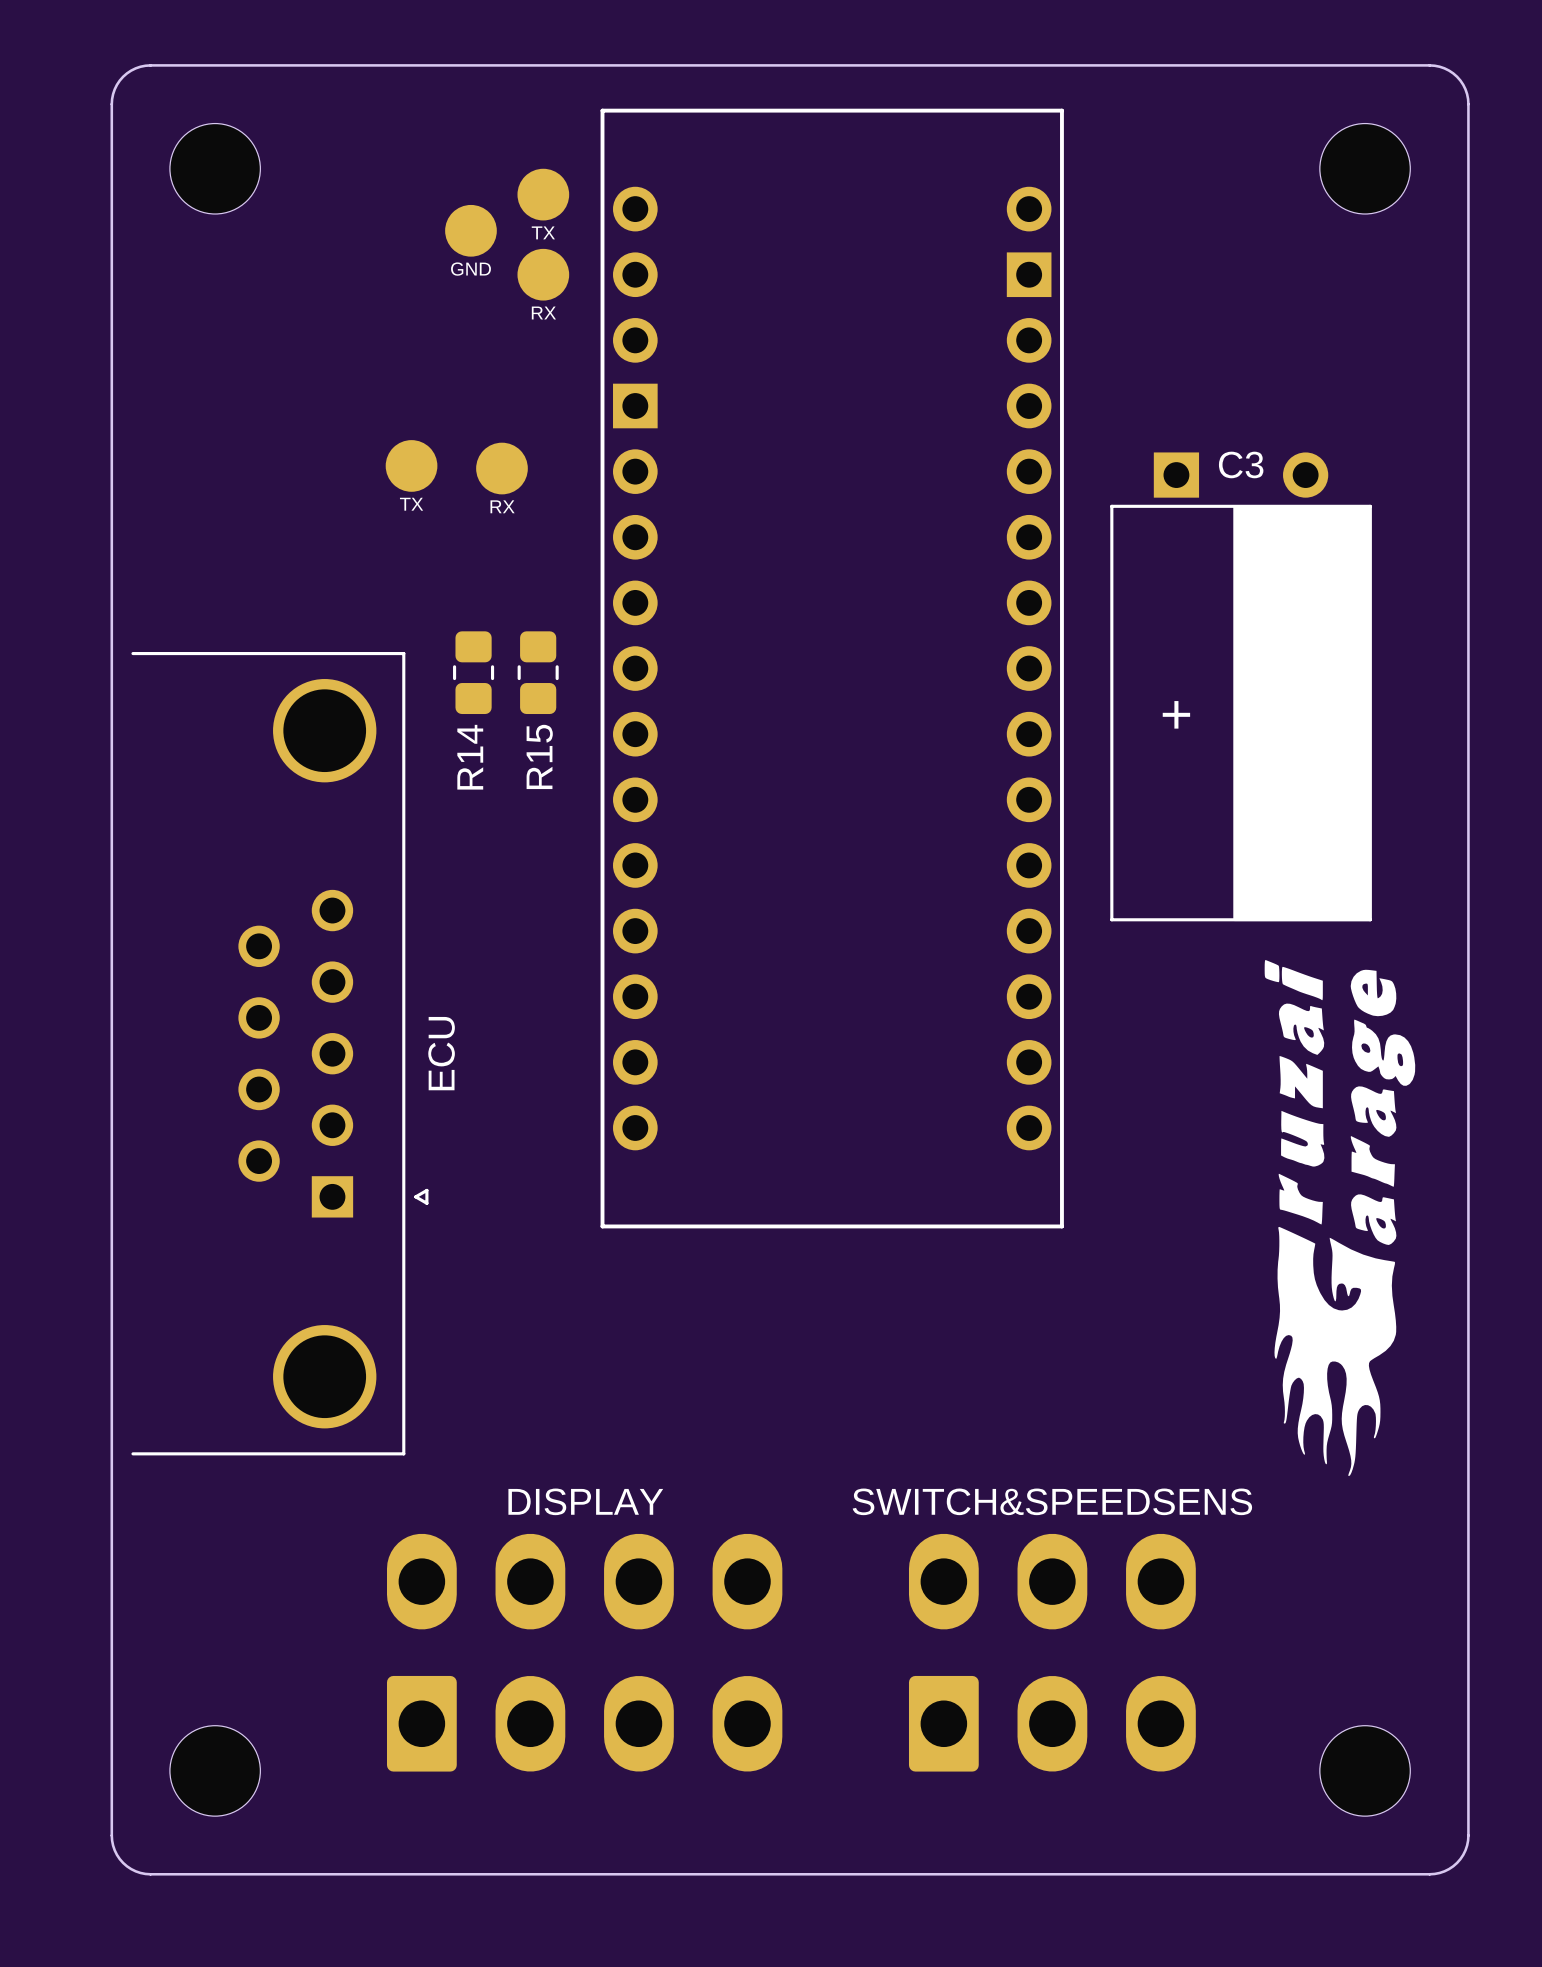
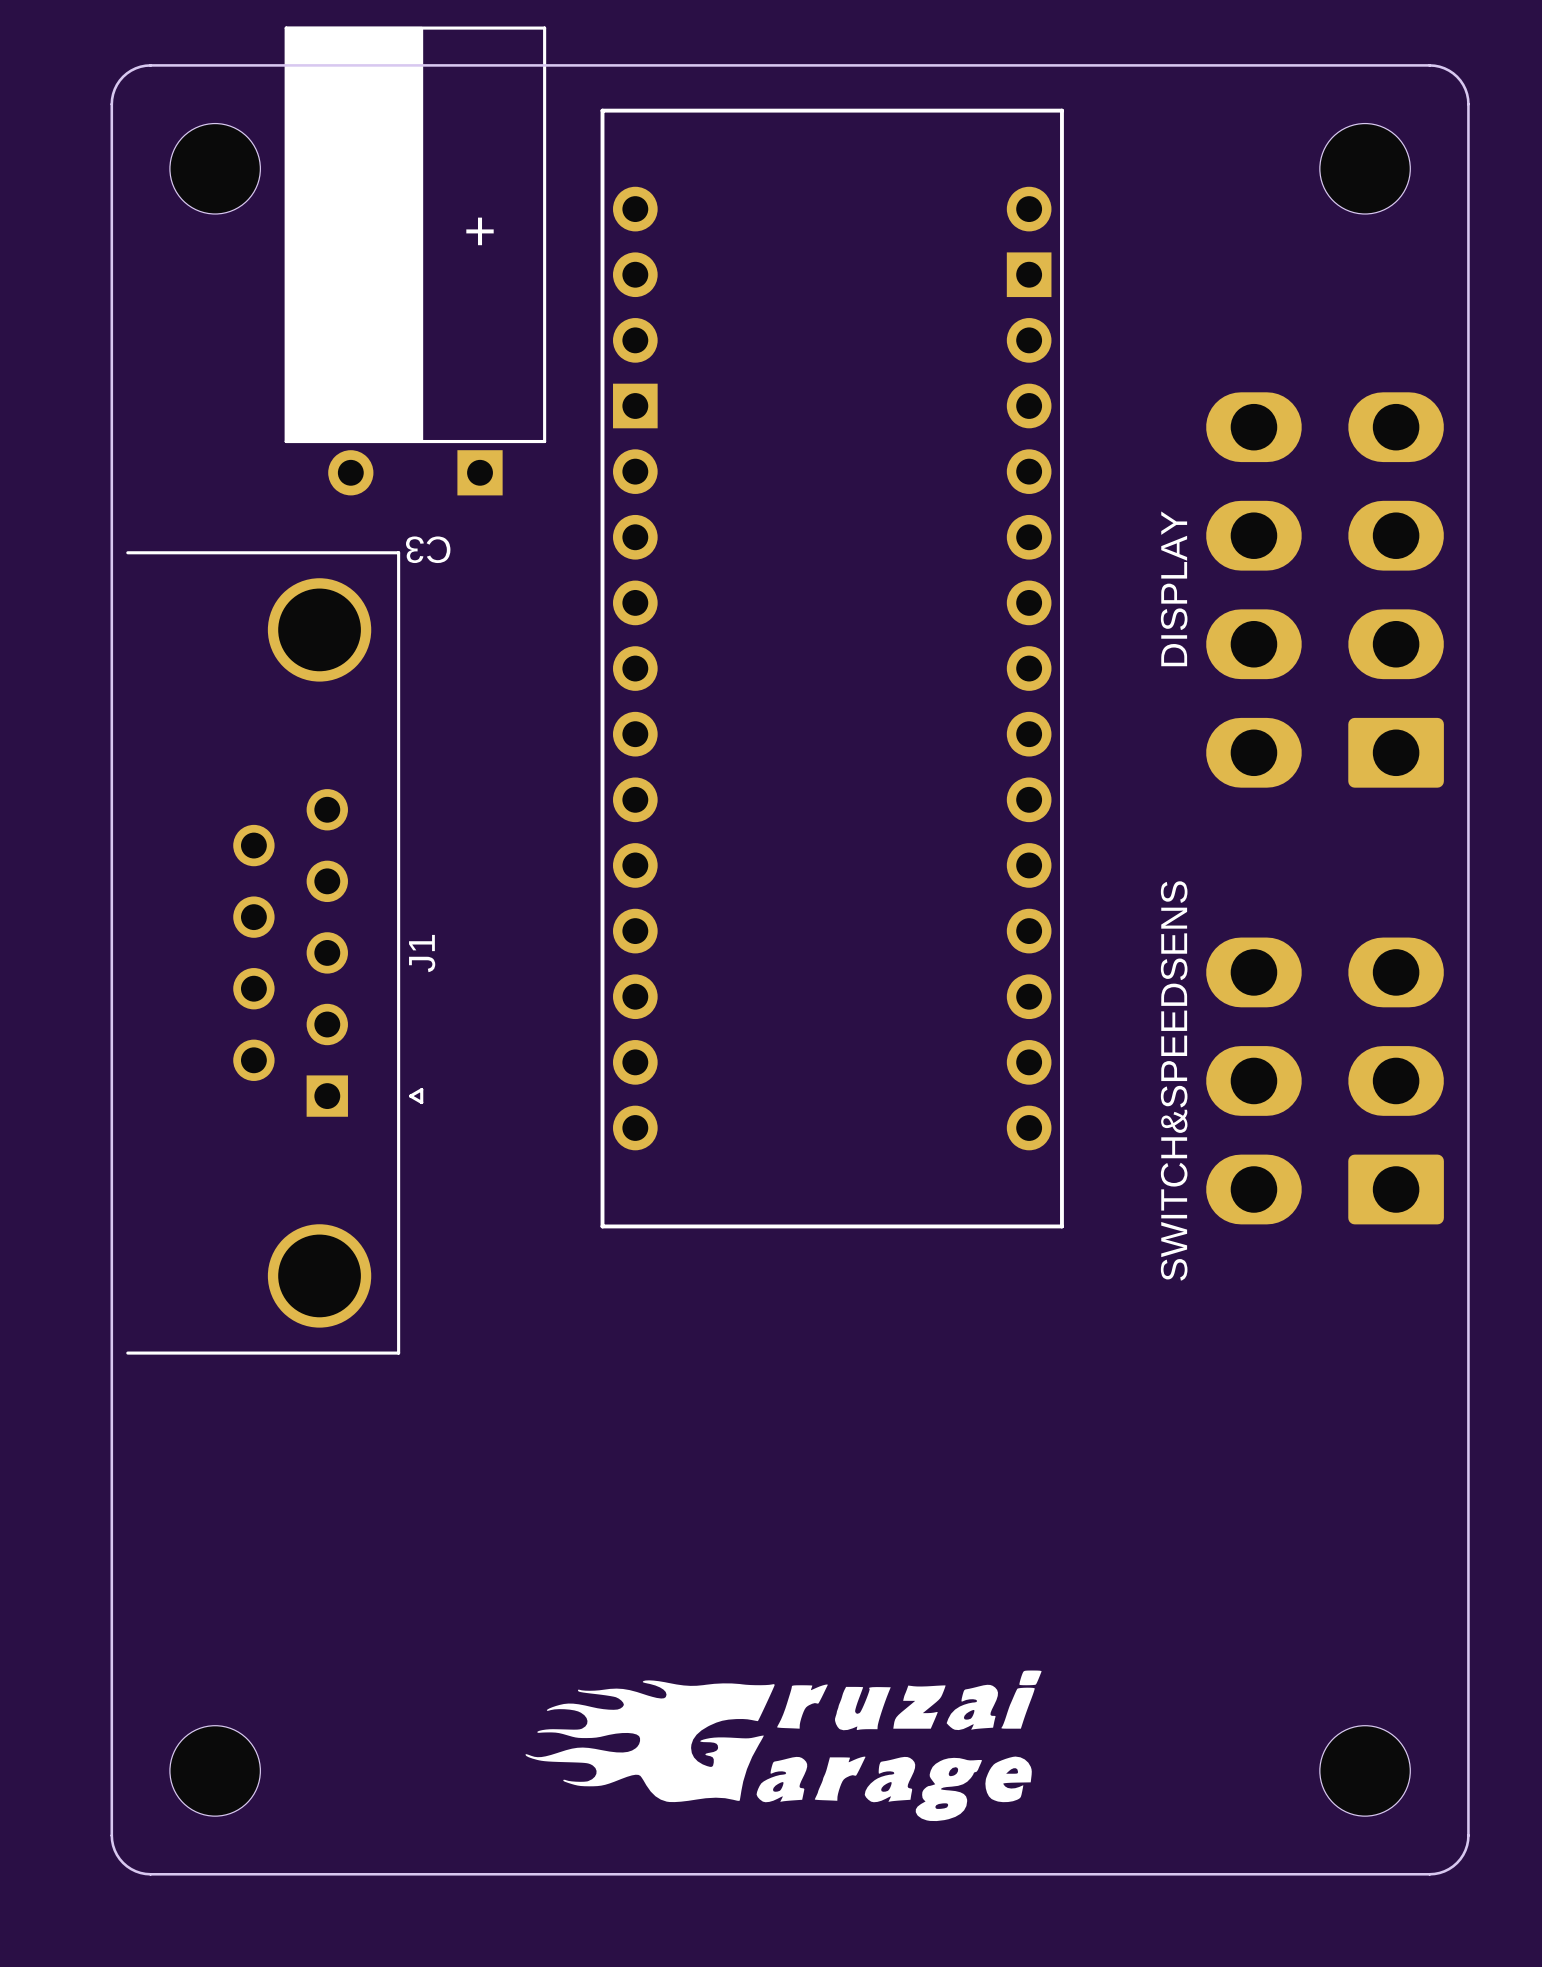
part: TX (543, 194) -> none
part: GND (470, 230) -> none
part: RX (543, 274) -> none
C3 name position: C3 (1241, 464) -> C3 (428, 549)
part: TX (411, 465) -> none
part: RX (501, 468) -> none
part: none -> DISPLAY (1325, 589)
R14: (473, 672) -> none
R15: (538, 672) -> none
C3 rotation: 0° (1241, 686) -> 180° (415, 260)
C3 position: (1241, 686) -> (415, 260)
J1: none -> (274, 952)
drawing: [1264, 960, 1416, 1477] -> none
part: ECU (279, 1053) -> none
part: DISPLAY (584, 1652) -> none
part rotation: 0° (1052, 1652) -> 90° counterclockwise (1325, 1080)
part position: (1052, 1652) -> (1325, 1080)
drawing: none -> [525, 1670, 1042, 1822]

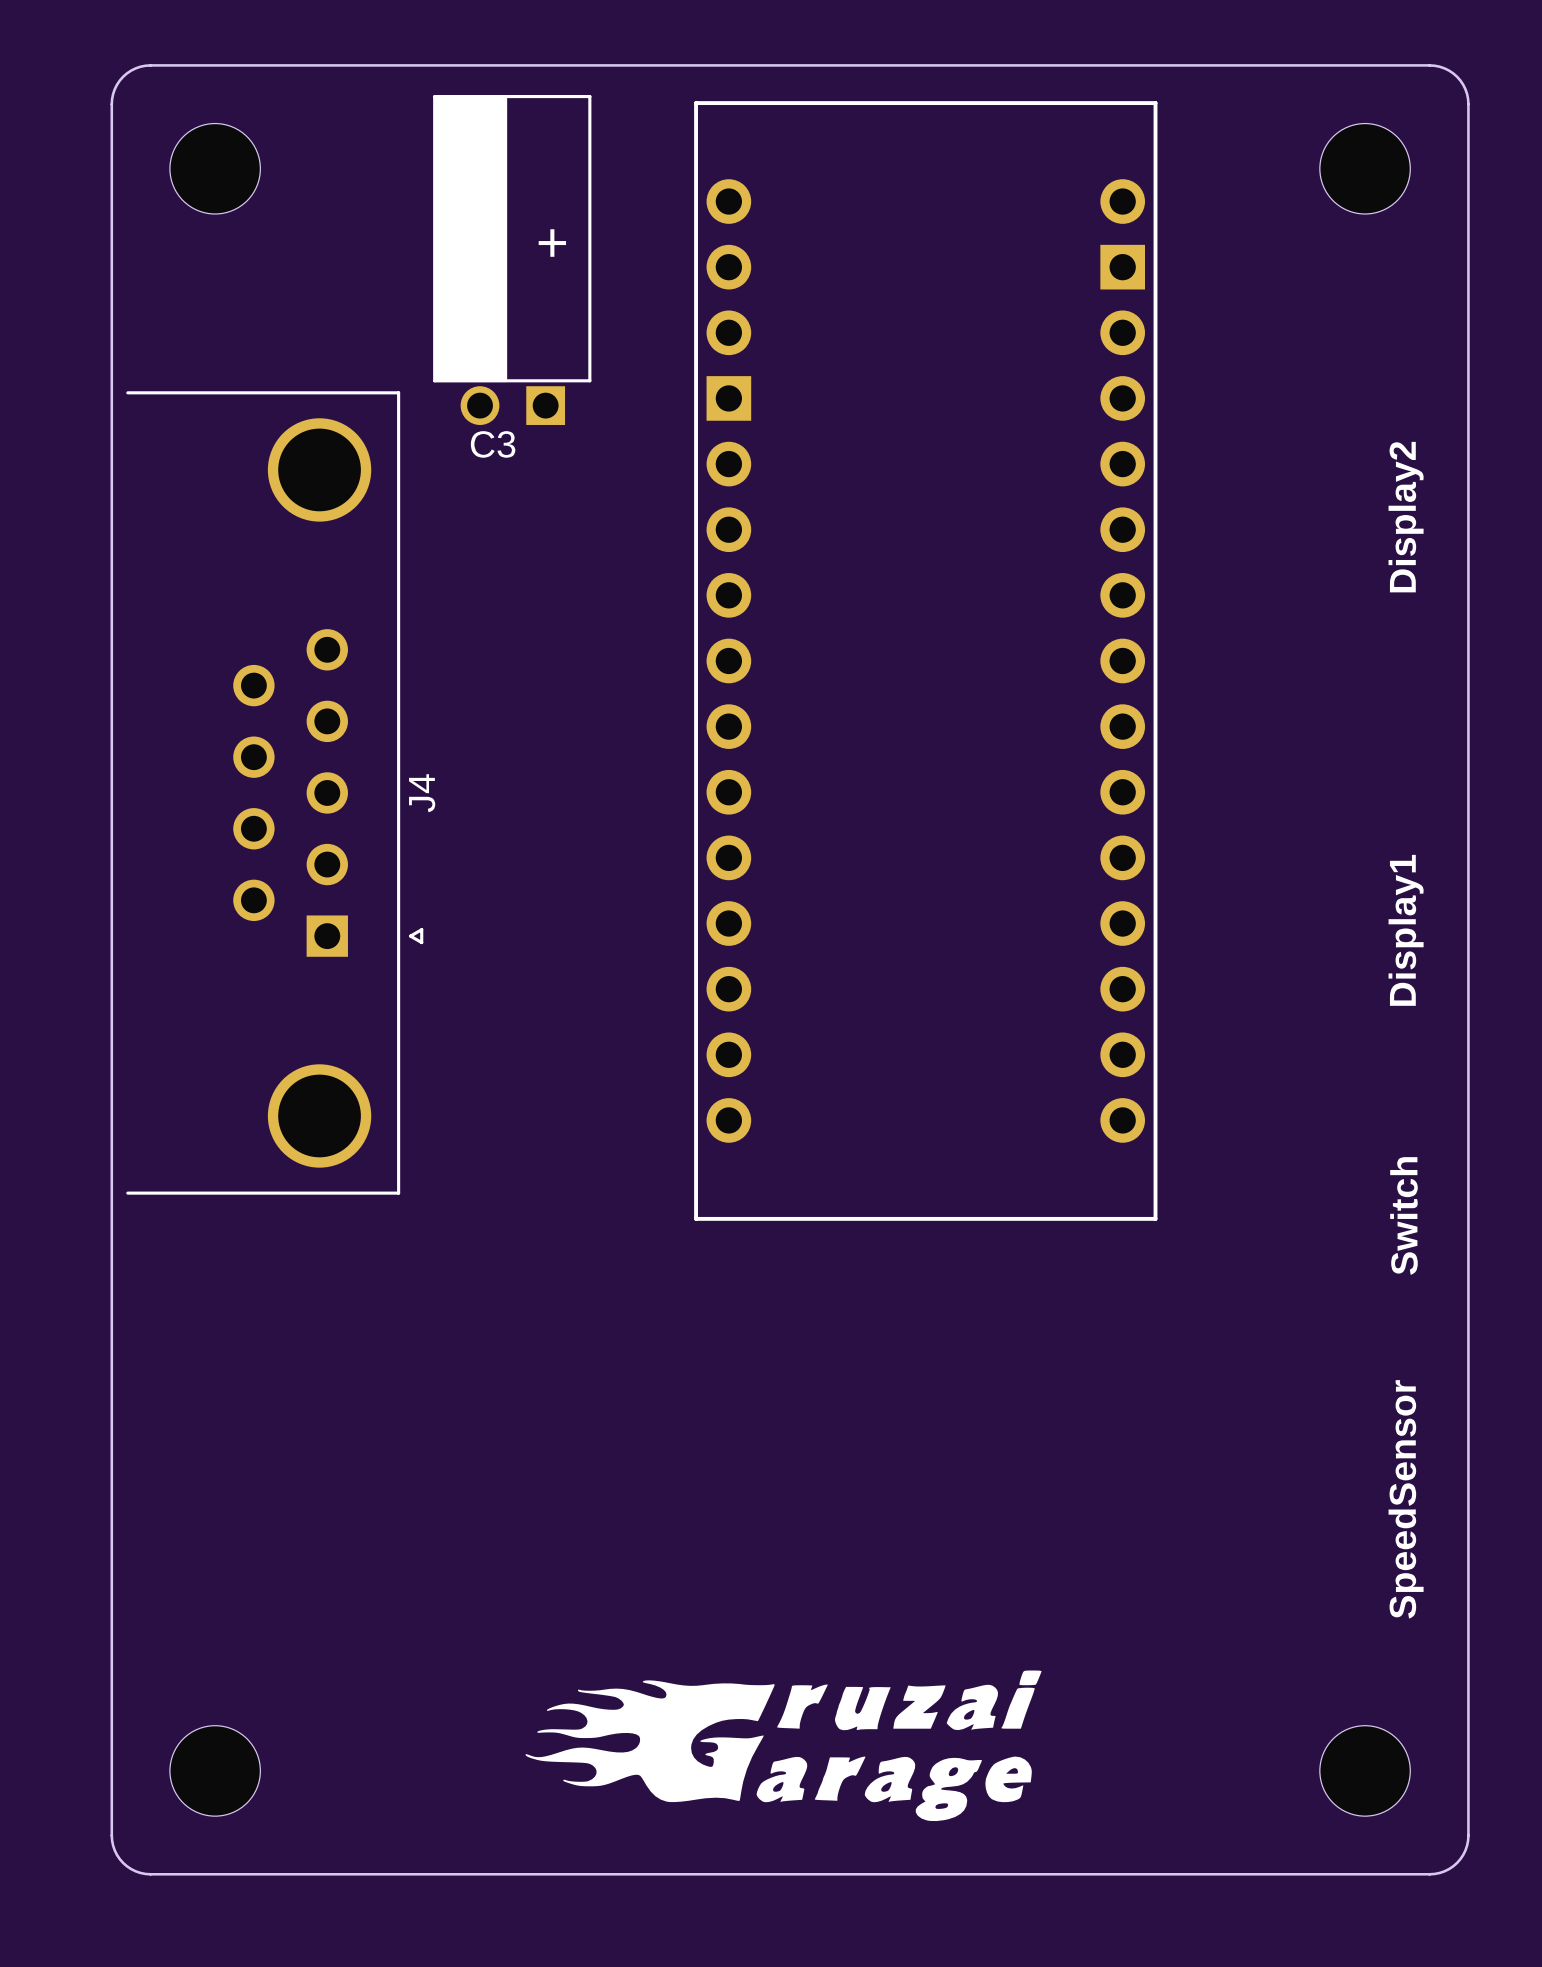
C3 footprint: [284, 26, 547, 496] -> [433, 95, 592, 425]
part: none -> Display2 (1406, 517)
C3 name position: C3 (428, 549) -> C3 (493, 444)
part: DISPLAY (1325, 589) -> none
part: none -> (925, 660)
part: (832, 668) -> none
J4: none -> (274, 792)
part: none -> Display1 (1406, 930)
J1: (274, 952) -> none
part: SWITCH&SPEEDSENS (1325, 1080) -> none
part: none -> Switch (1403, 1215)
part: none -> SpeedSensor (1406, 1499)

